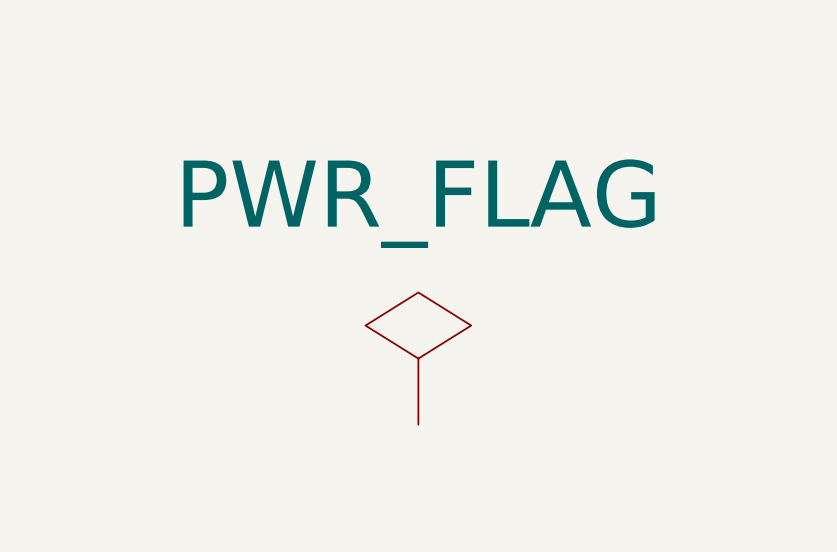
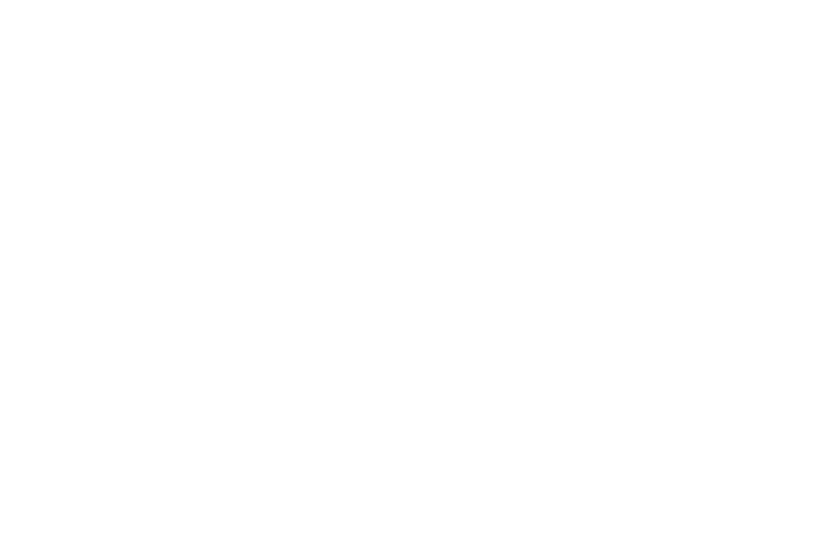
power symbol: PWR_FLAG (418, 358) -> none

